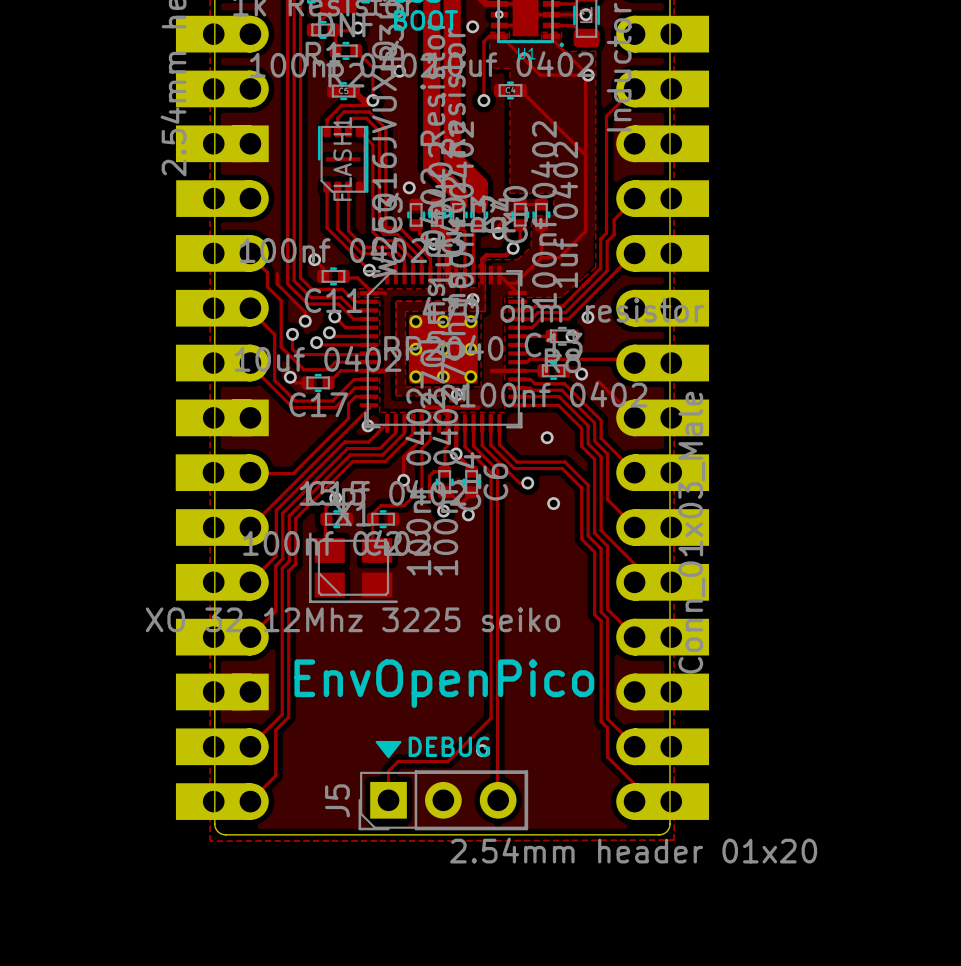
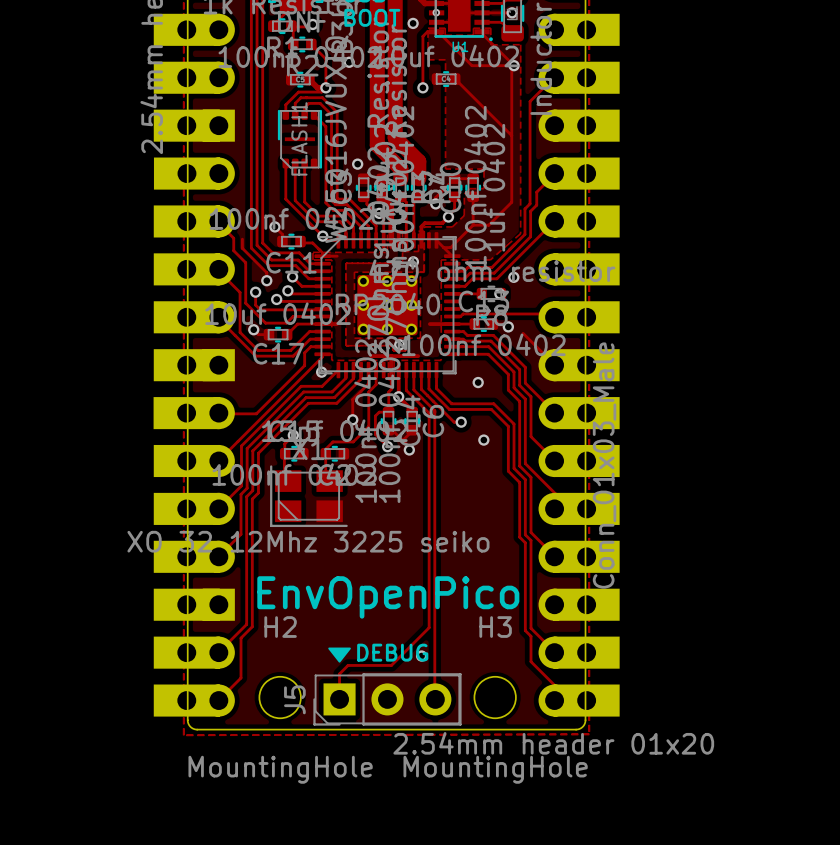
H2: none -> MountingHole (280, 697)
H3: none -> MountingHole (495, 697)

